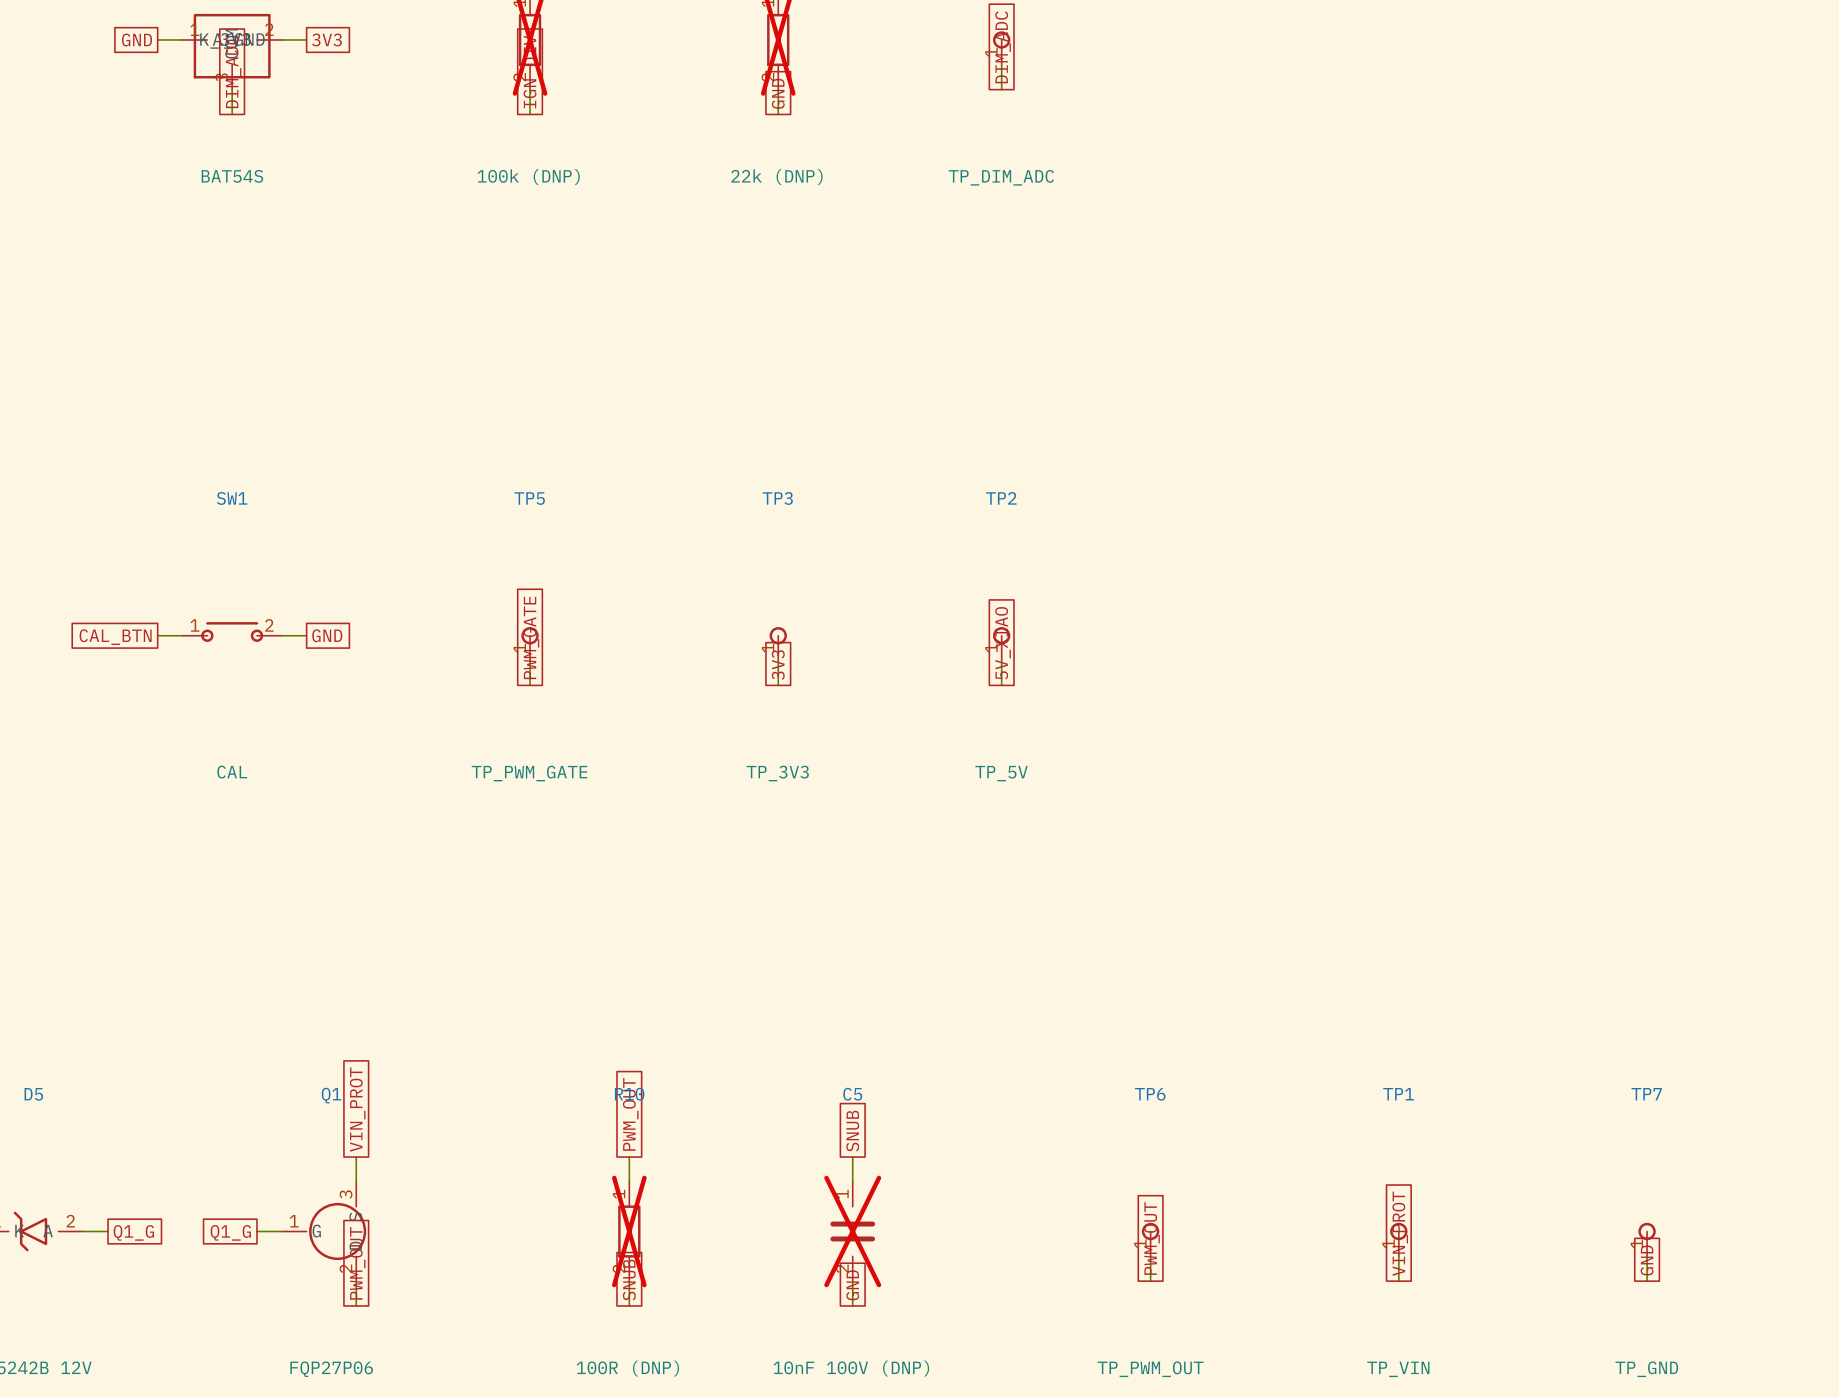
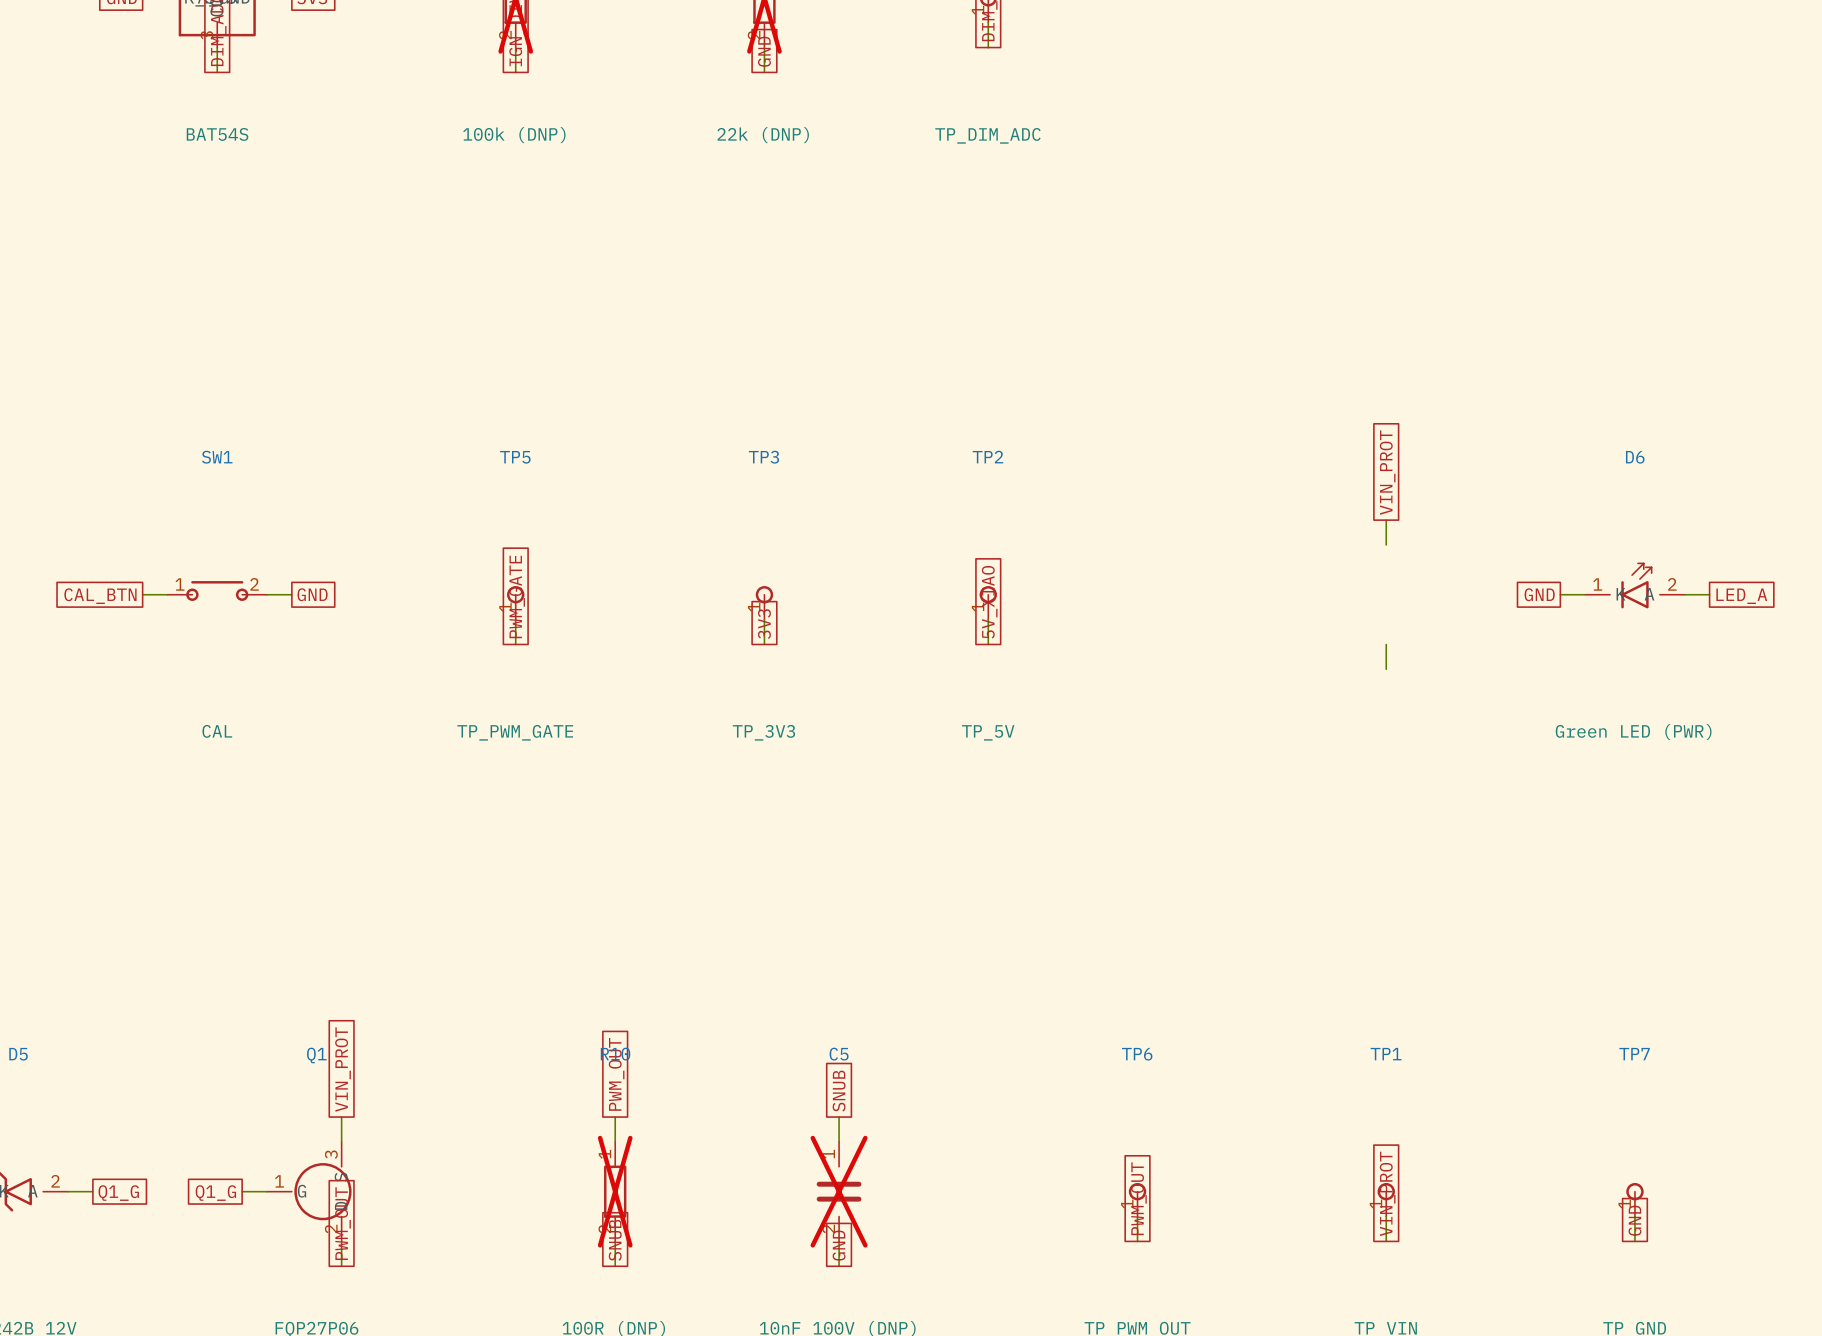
global label: none -> VIN_PROT (1387, 472)
wire: none -> (1386, 520) (1386, 545)
D6: none -> Green LED (PWR) (1634, 585)
global label: none -> GND (1539, 594)
wire: none -> (1560, 594) (1585, 594)
wire: none -> (1684, 594) (1709, 594)
global label: none -> LED_A (1741, 596)
wire: none -> (1386, 644) (1386, 669)

